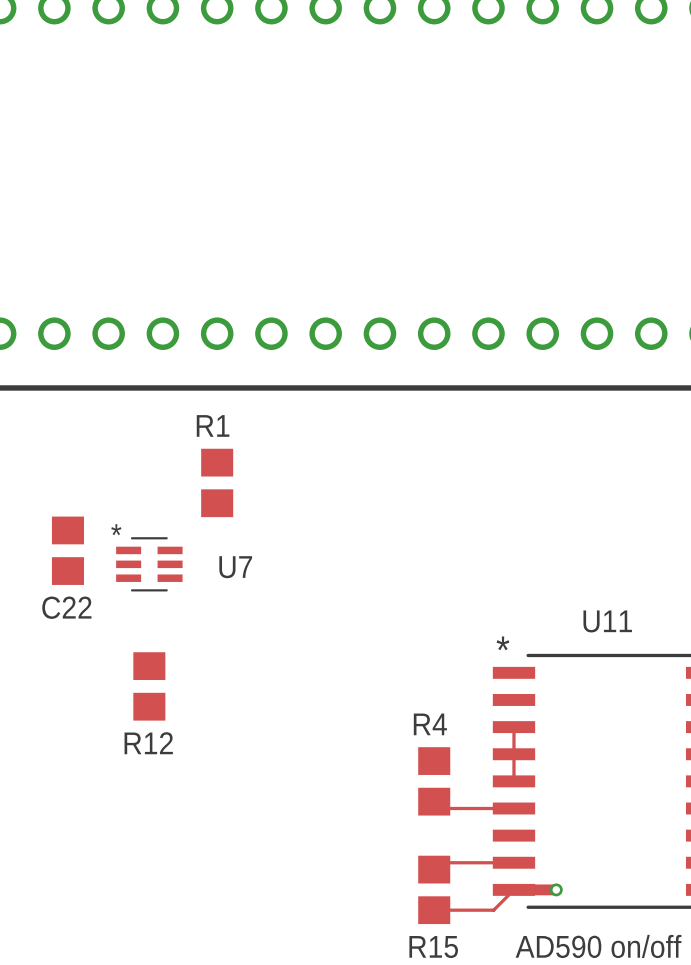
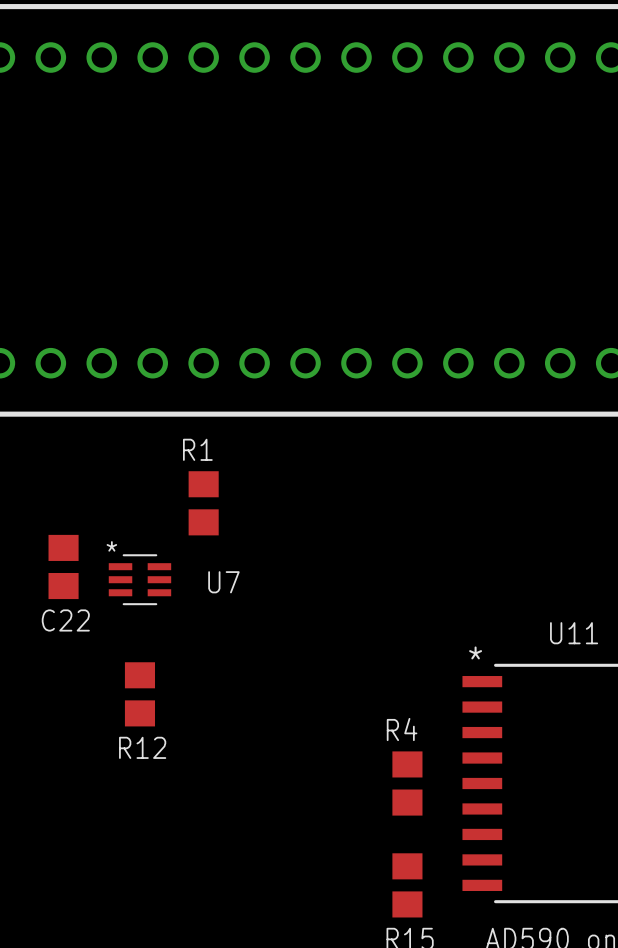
top track: (513, 727) (513, 781) -> none
top track: (434, 801) (441, 808) (513, 808) -> none
top track: (513, 862) (441, 862) (434, 869) -> none
top track: (556, 889) (513, 889) (493, 910) (434, 910) -> none
via: (556, 889) -> none

